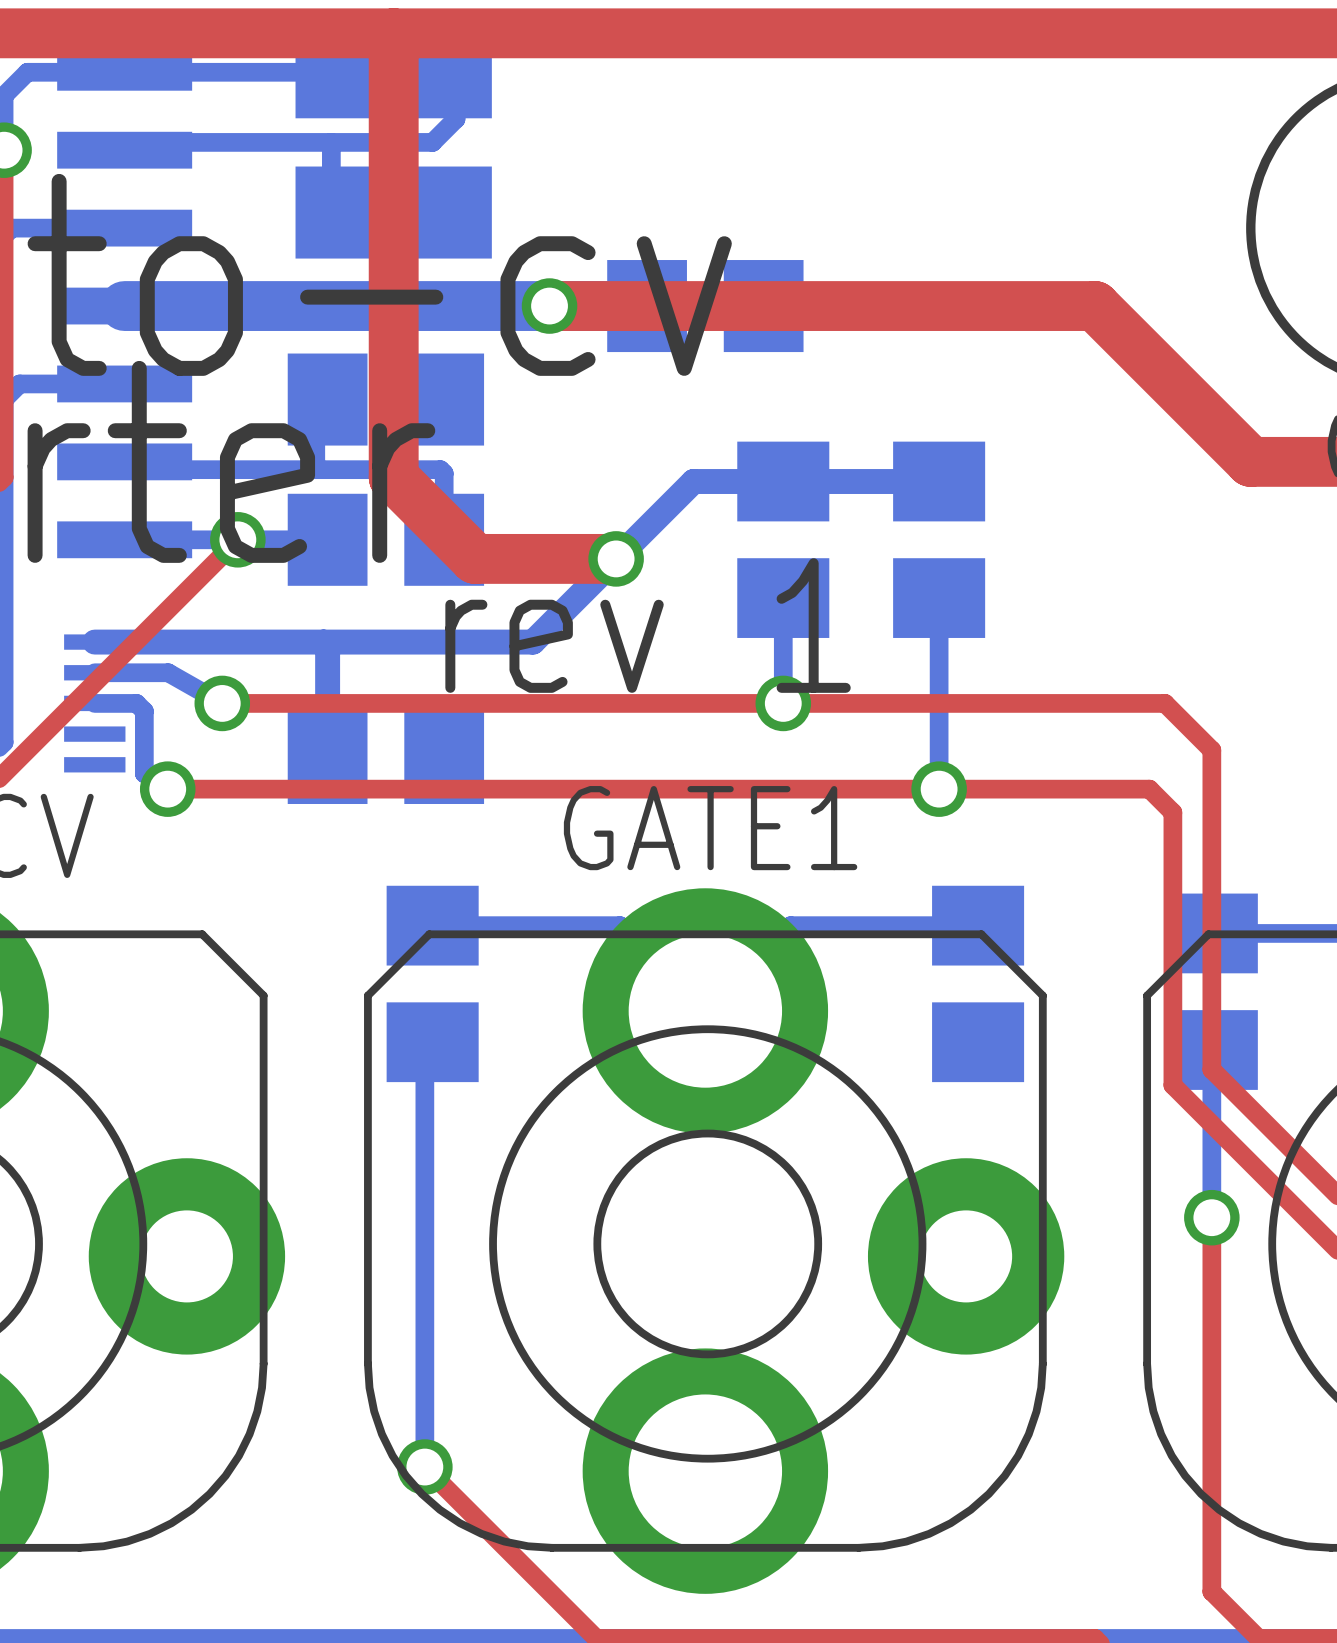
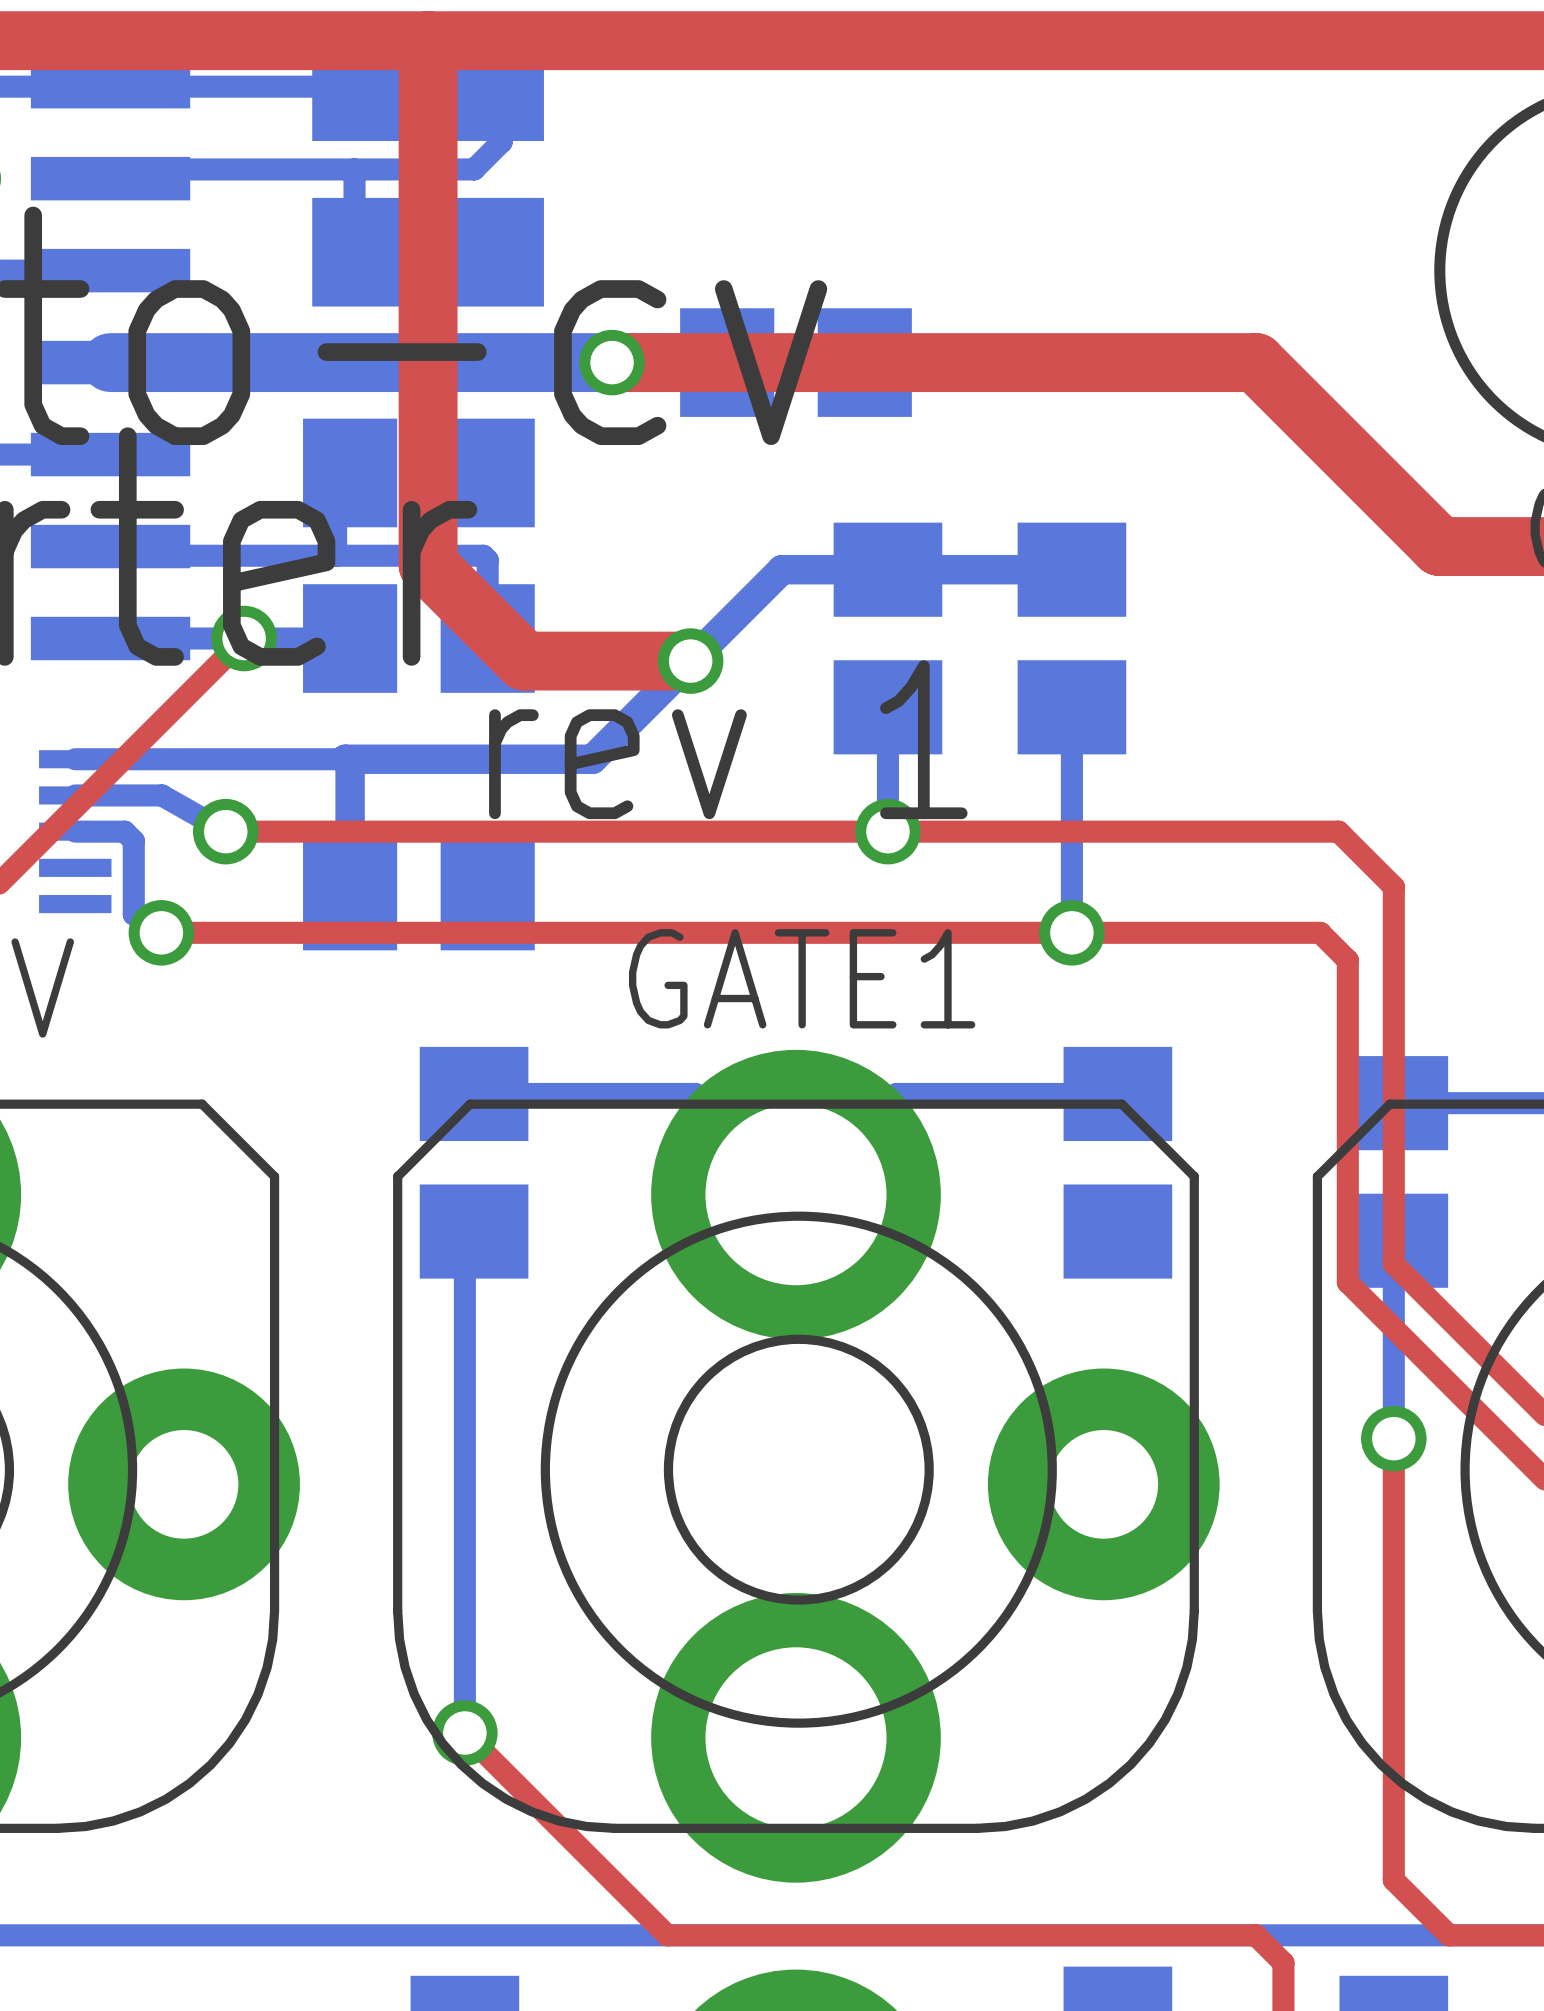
bottom track width: thick (94, 642) (323, 642) -> thin (75, 759) (345, 759)

